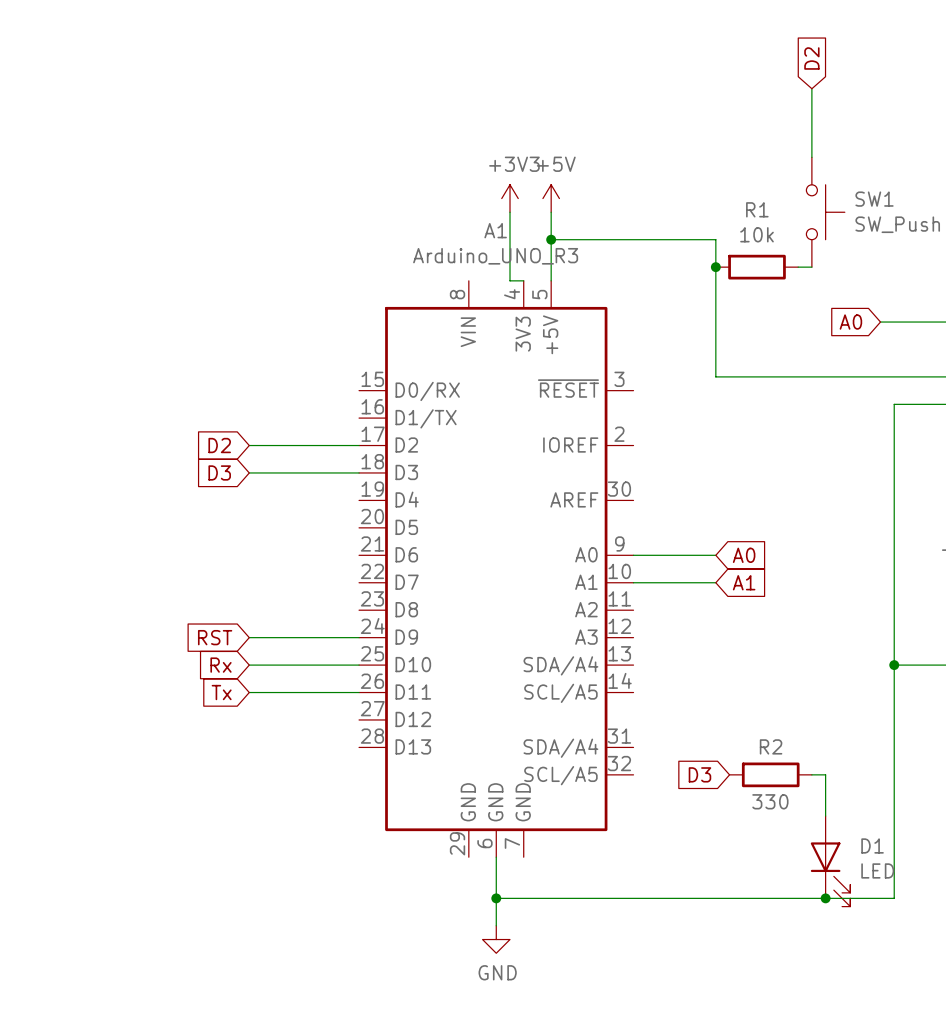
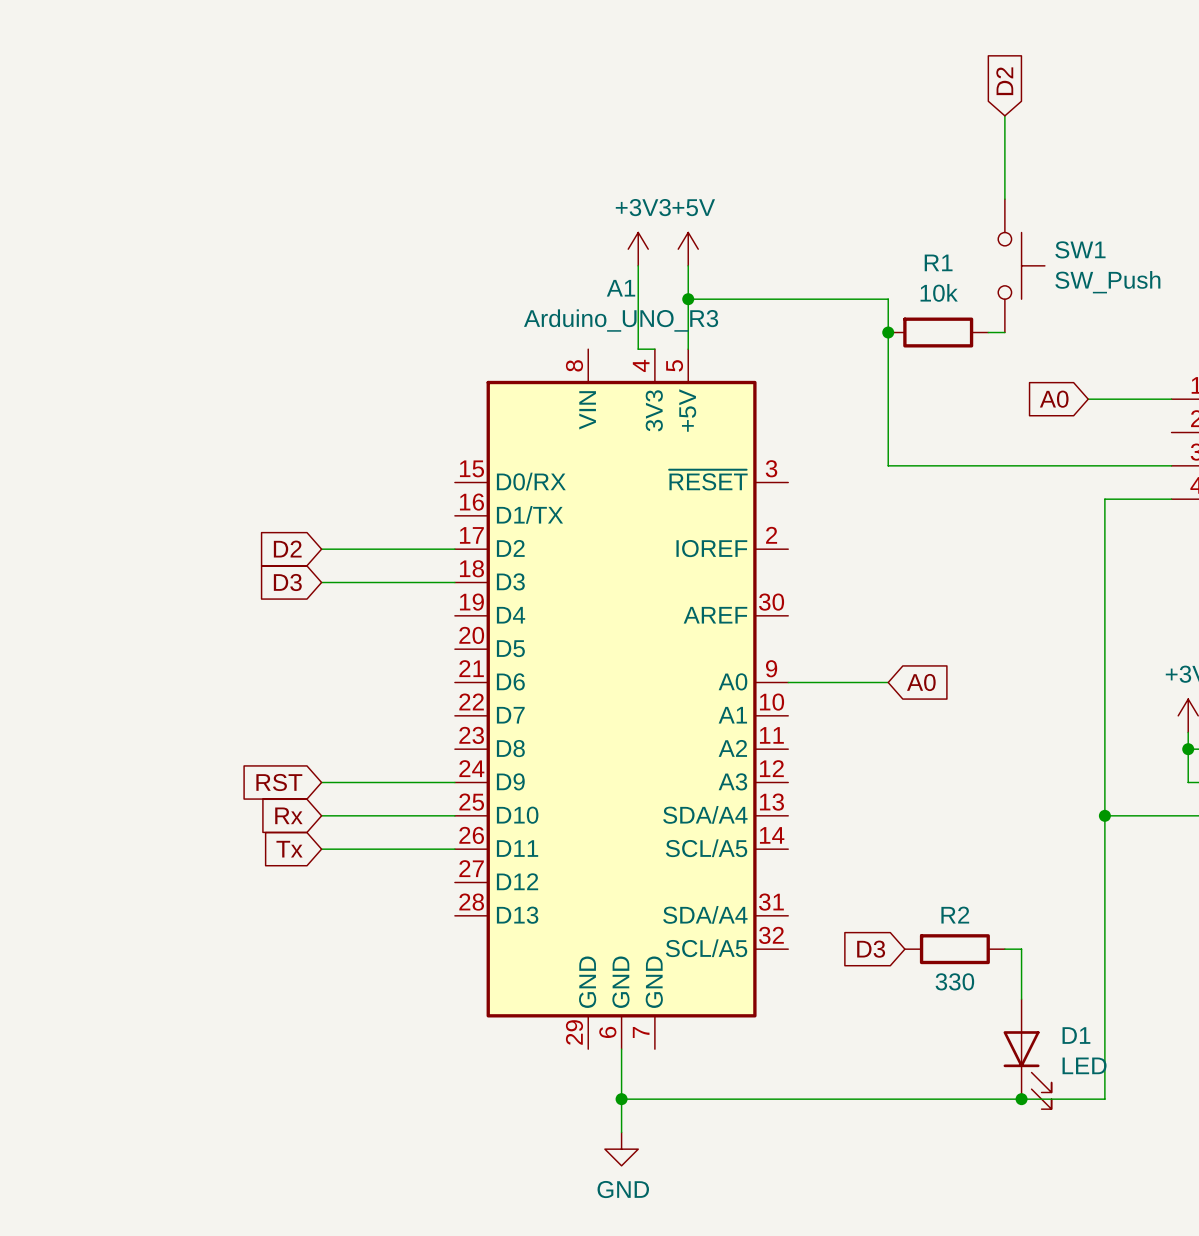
wire: (633, 582) (715, 582) -> none
global label: A1 (744, 582) -> none

